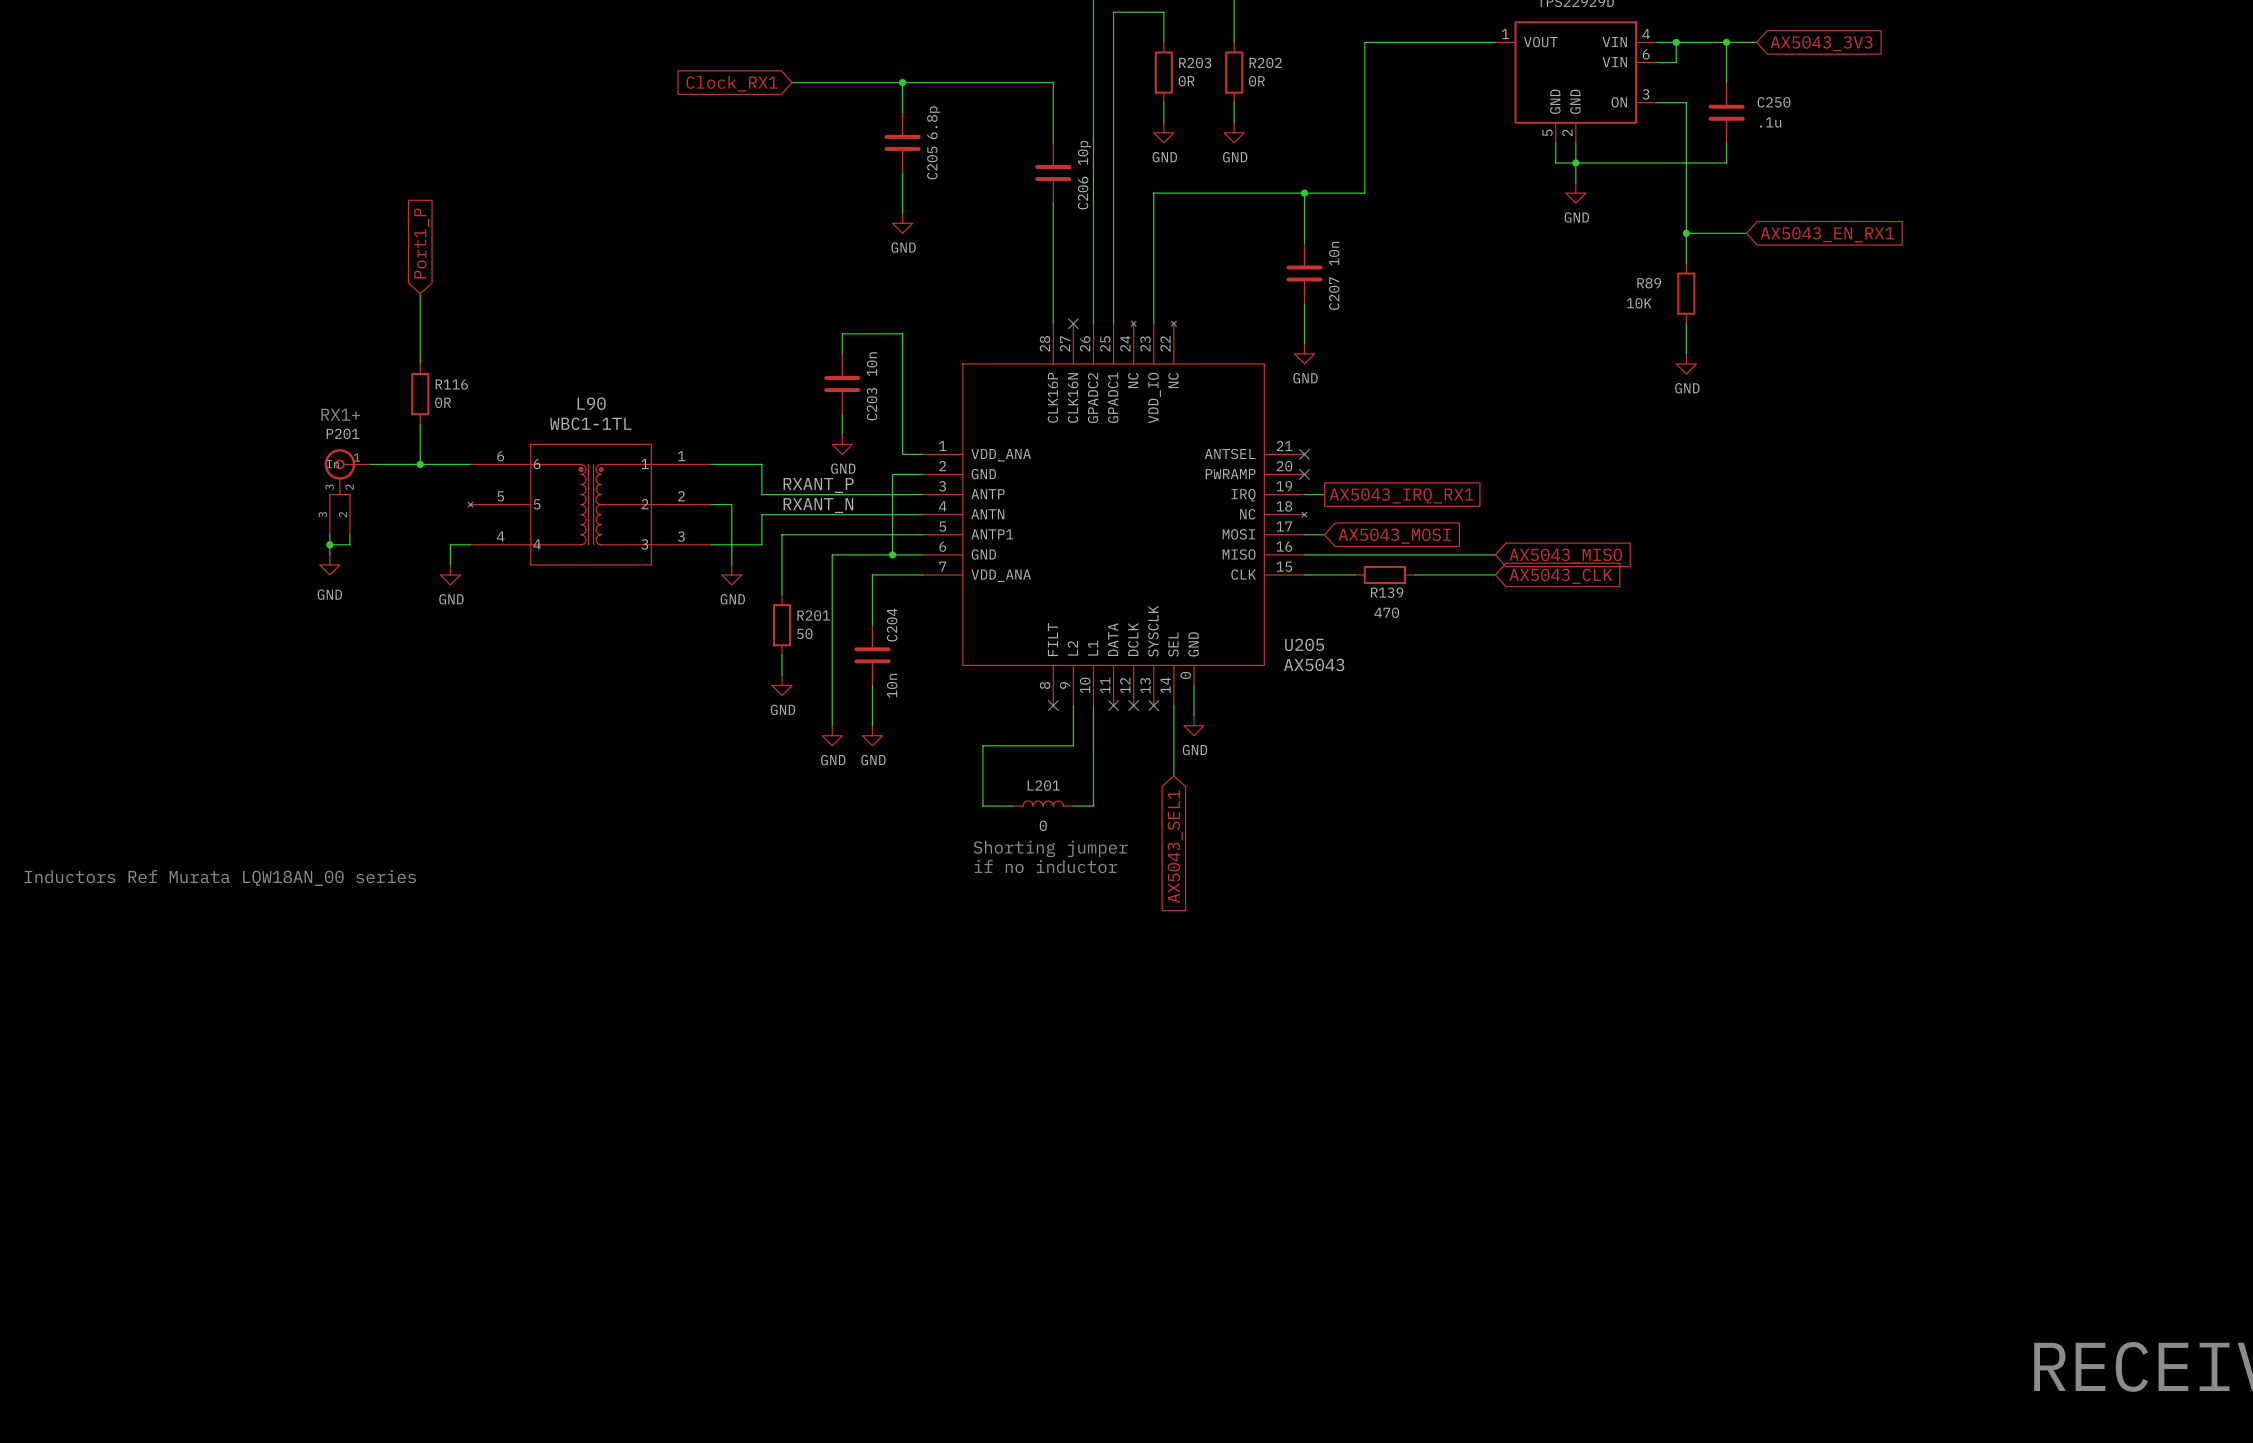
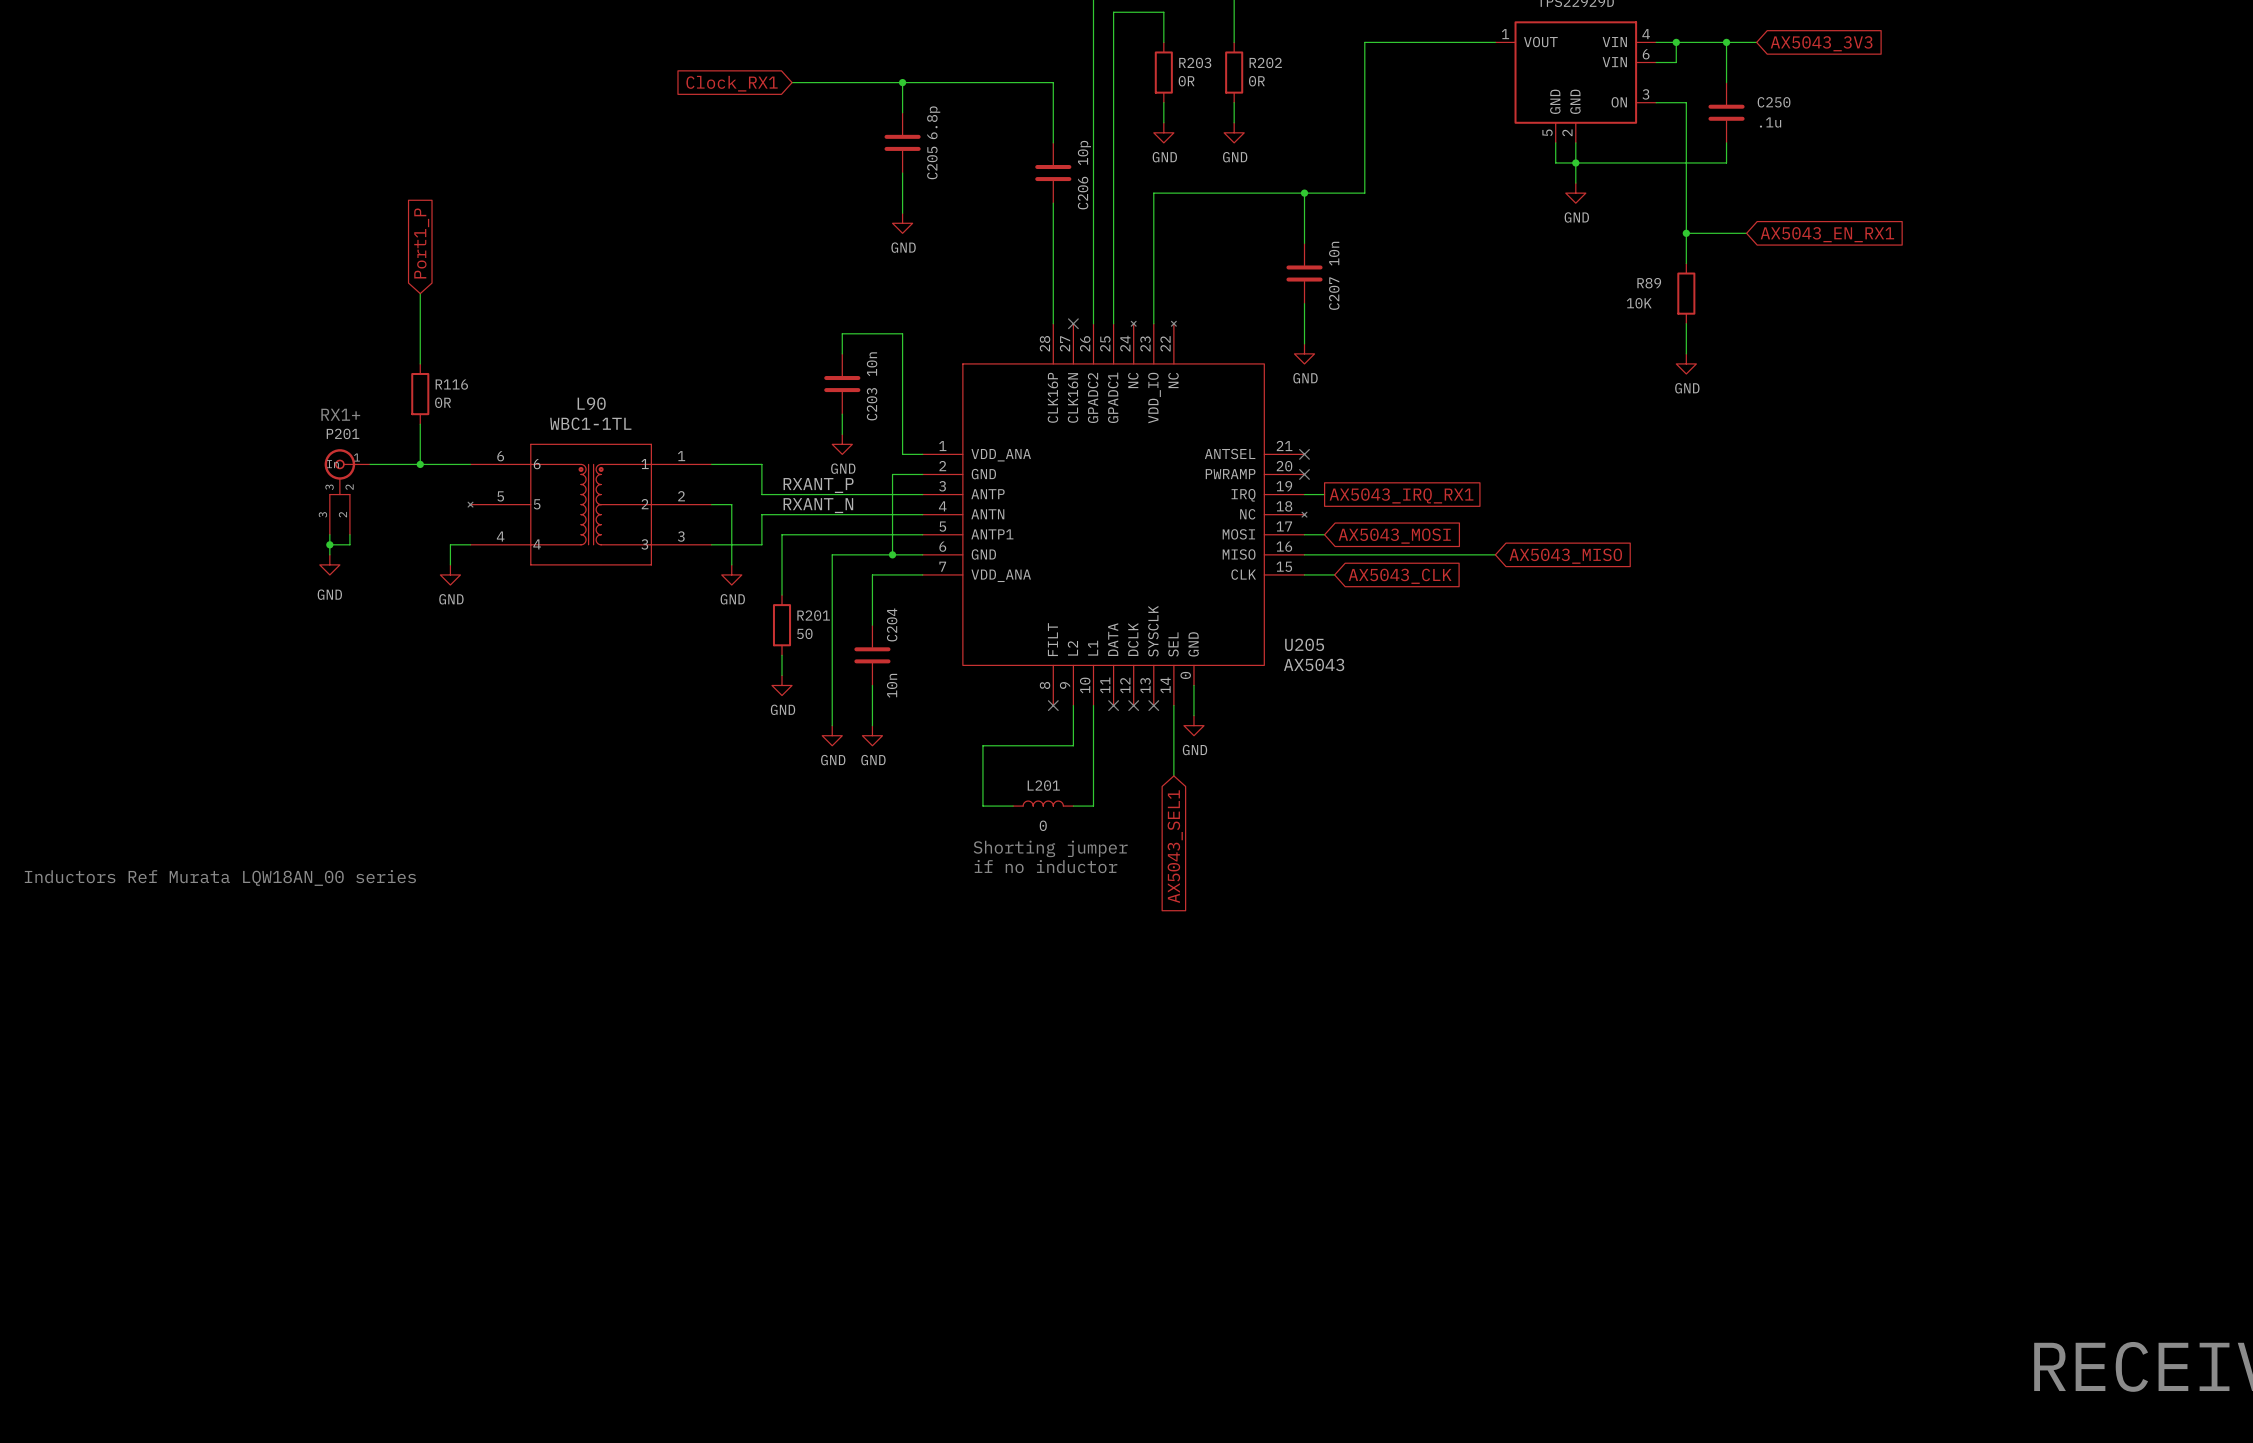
wire: (1334, 574) (1354, 574) -> none
R139: 470 (1384, 574) -> none
wire: (1415, 574) (1495, 574) -> none
global label position: AX5043_CLK (1560, 576) -> AX5043_CLK (1400, 576)

